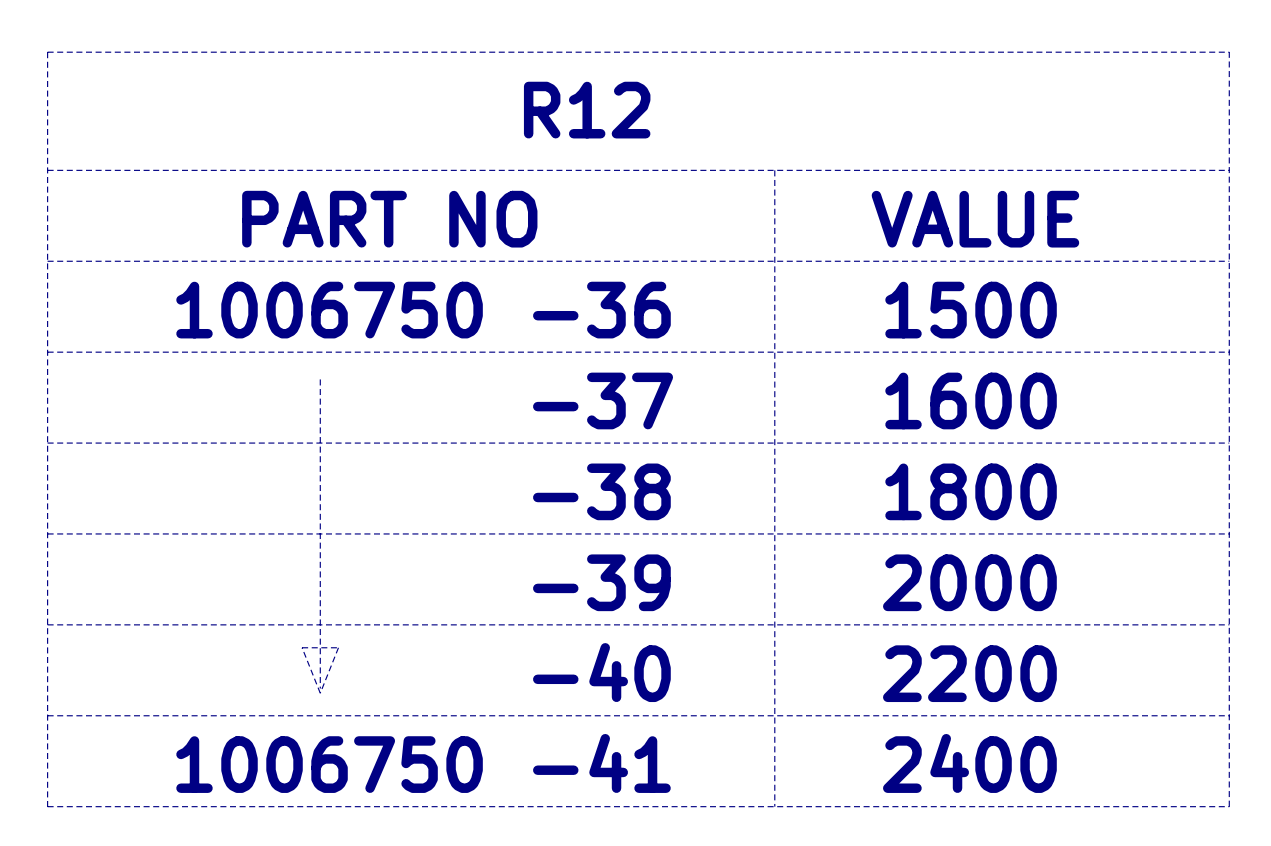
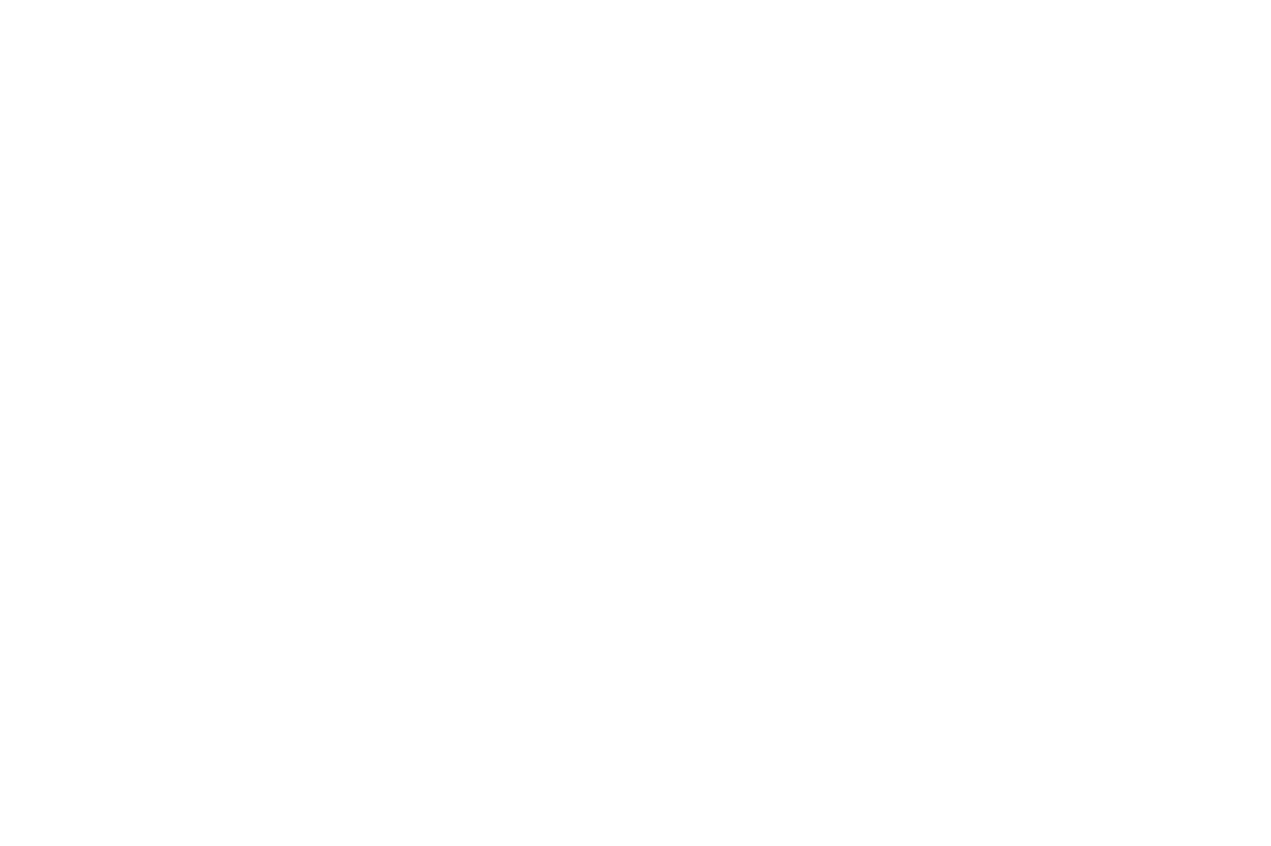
line: (47, 52) (1229, 52) (1229, 806) (47, 806) (47, 52) -> none
text: R12 (587, 110) -> none
line: (47, 170) (1229, 170) -> none
line: (774, 170) (774, 806) -> none
text: PART NO (389, 219) -> none
text: VALUE (975, 219) -> none
line: (47, 261) (1229, 261) -> none
text: 1006750 (329, 310) -> none
text: -36 (601, 310) -> none
text: 1500 (971, 310) -> none
line: (47, 352) (1229, 352) -> none
line: (320, 379) (320, 688) -> none
text: -37 (603, 400) -> none
text: 1600 (971, 400) -> none
line: (47, 443) (1229, 443) -> none
text: -38 (601, 491) -> none
text: 1800 (971, 491) -> none
line: (47, 533) (1229, 533) -> none
text: -39 (601, 582) -> none
text: 2000 (969, 582) -> none
line: (47, 624) (1229, 624) -> none
line: (302, 647) (320, 693) (338, 647) (302, 647) -> none
text: -40 (601, 672) -> none
text: 2200 (969, 673) -> none
line: (47, 715) (1229, 715) -> none
text: -41 (601, 763) -> none
text: 2400 (969, 763) -> none
text: 1006750 (329, 764) -> none

